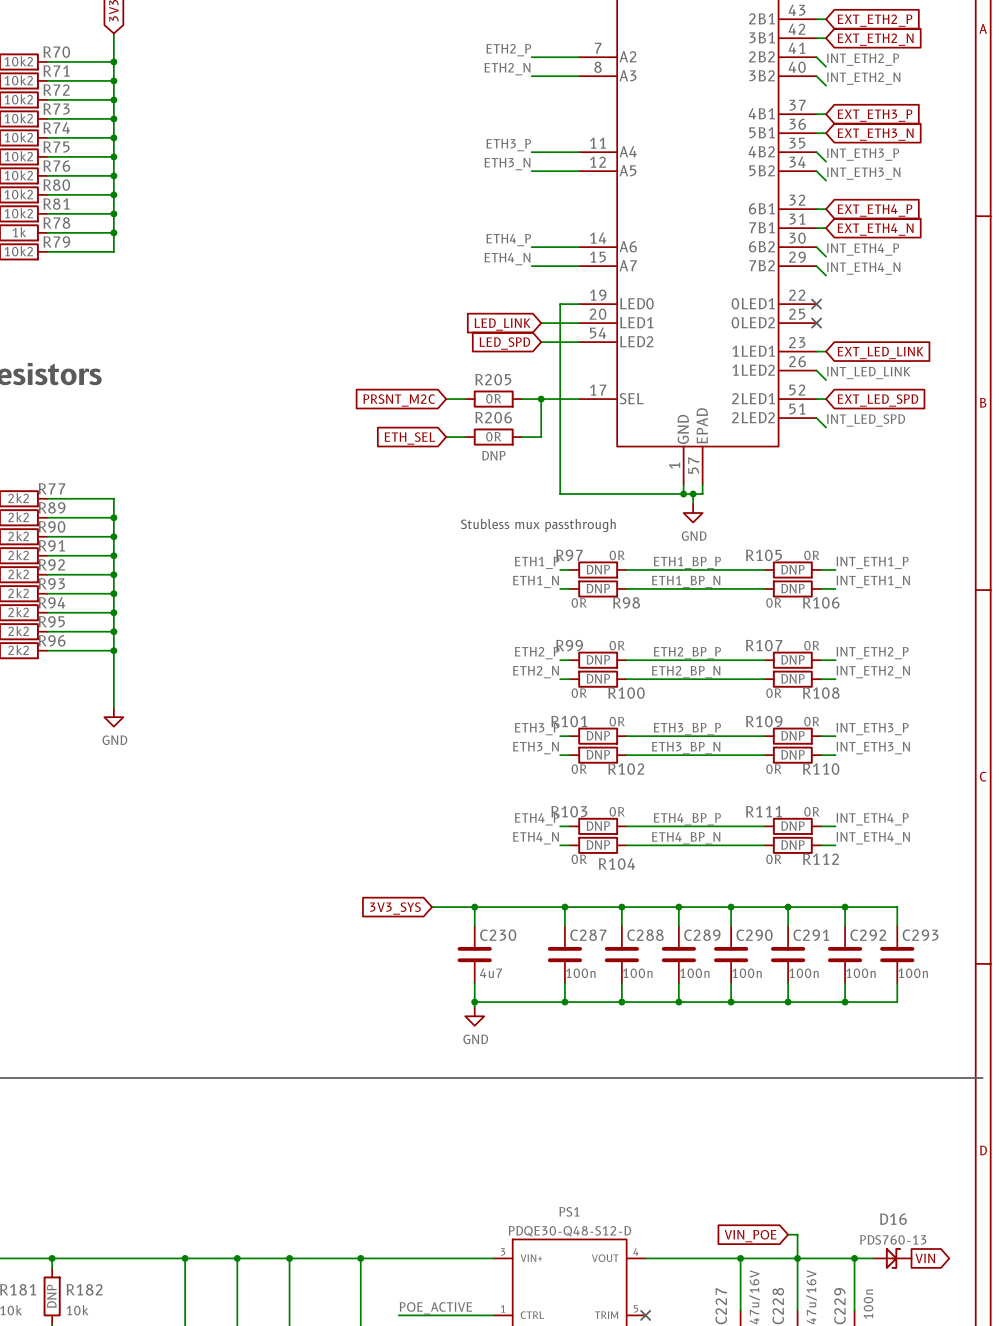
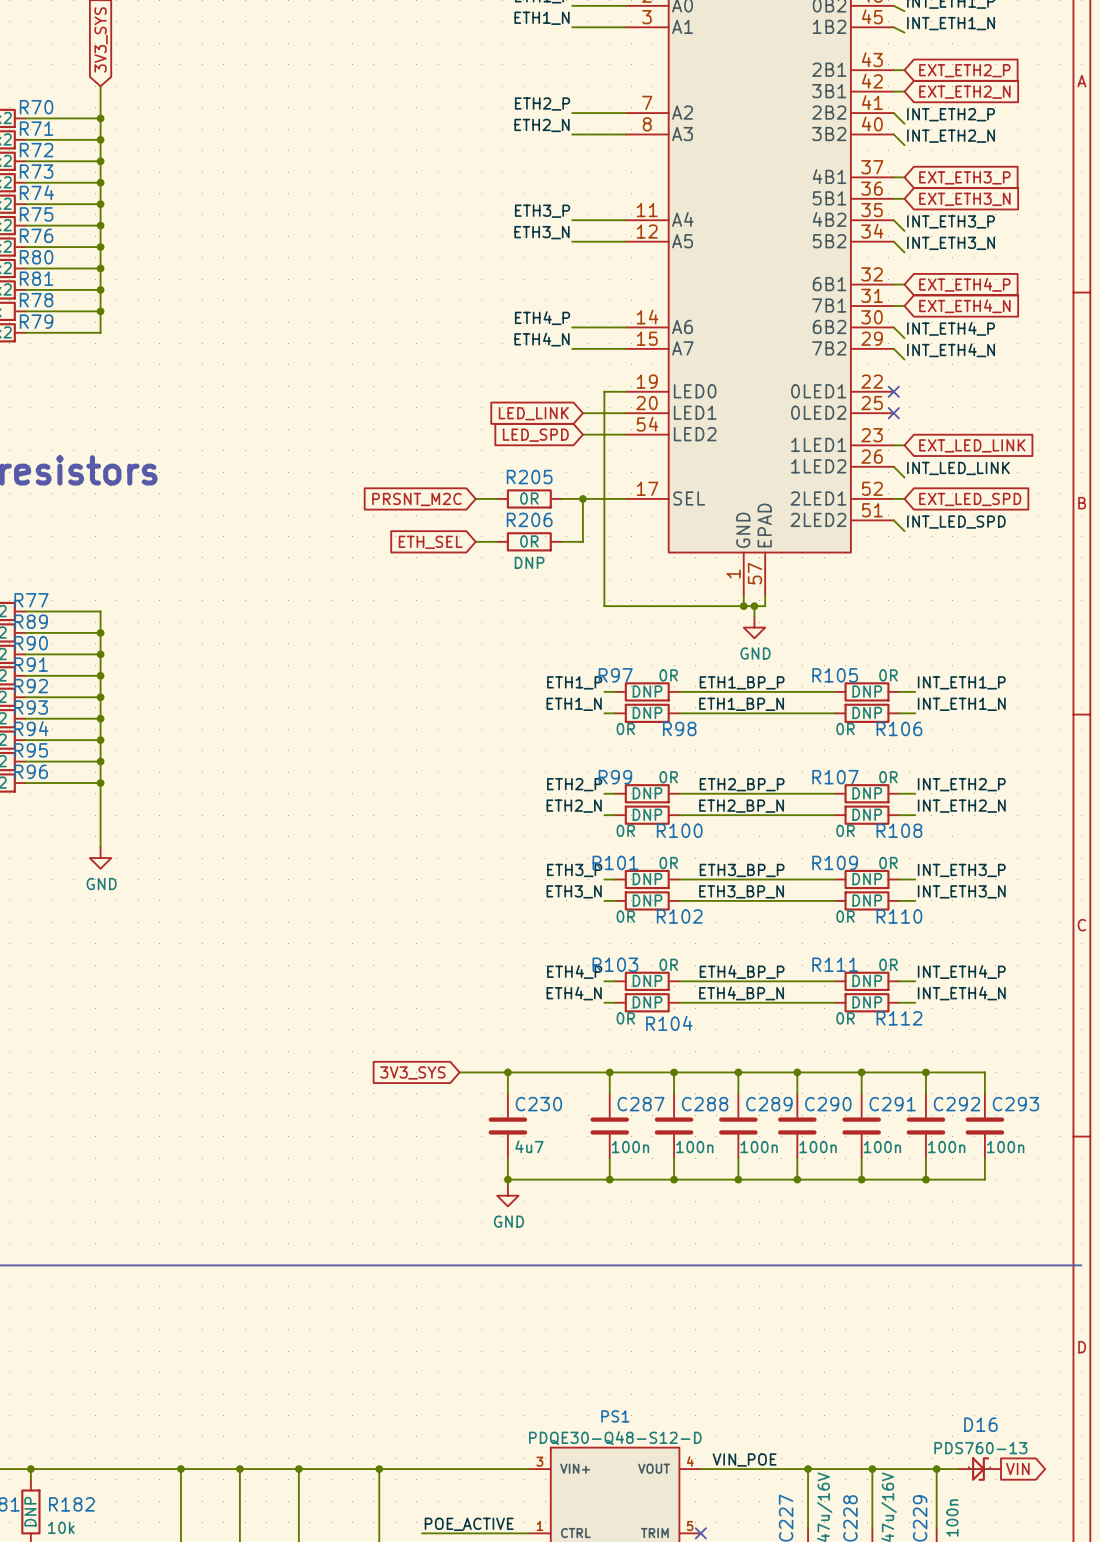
text: Stubless mux passthrough (538, 525) -> none
wire: (788, 1234) (797, 1234) (797, 1258) -> none
global label: VIN_POE (750, 1236) -> none
label: none -> VIN_POE (744, 1460)

